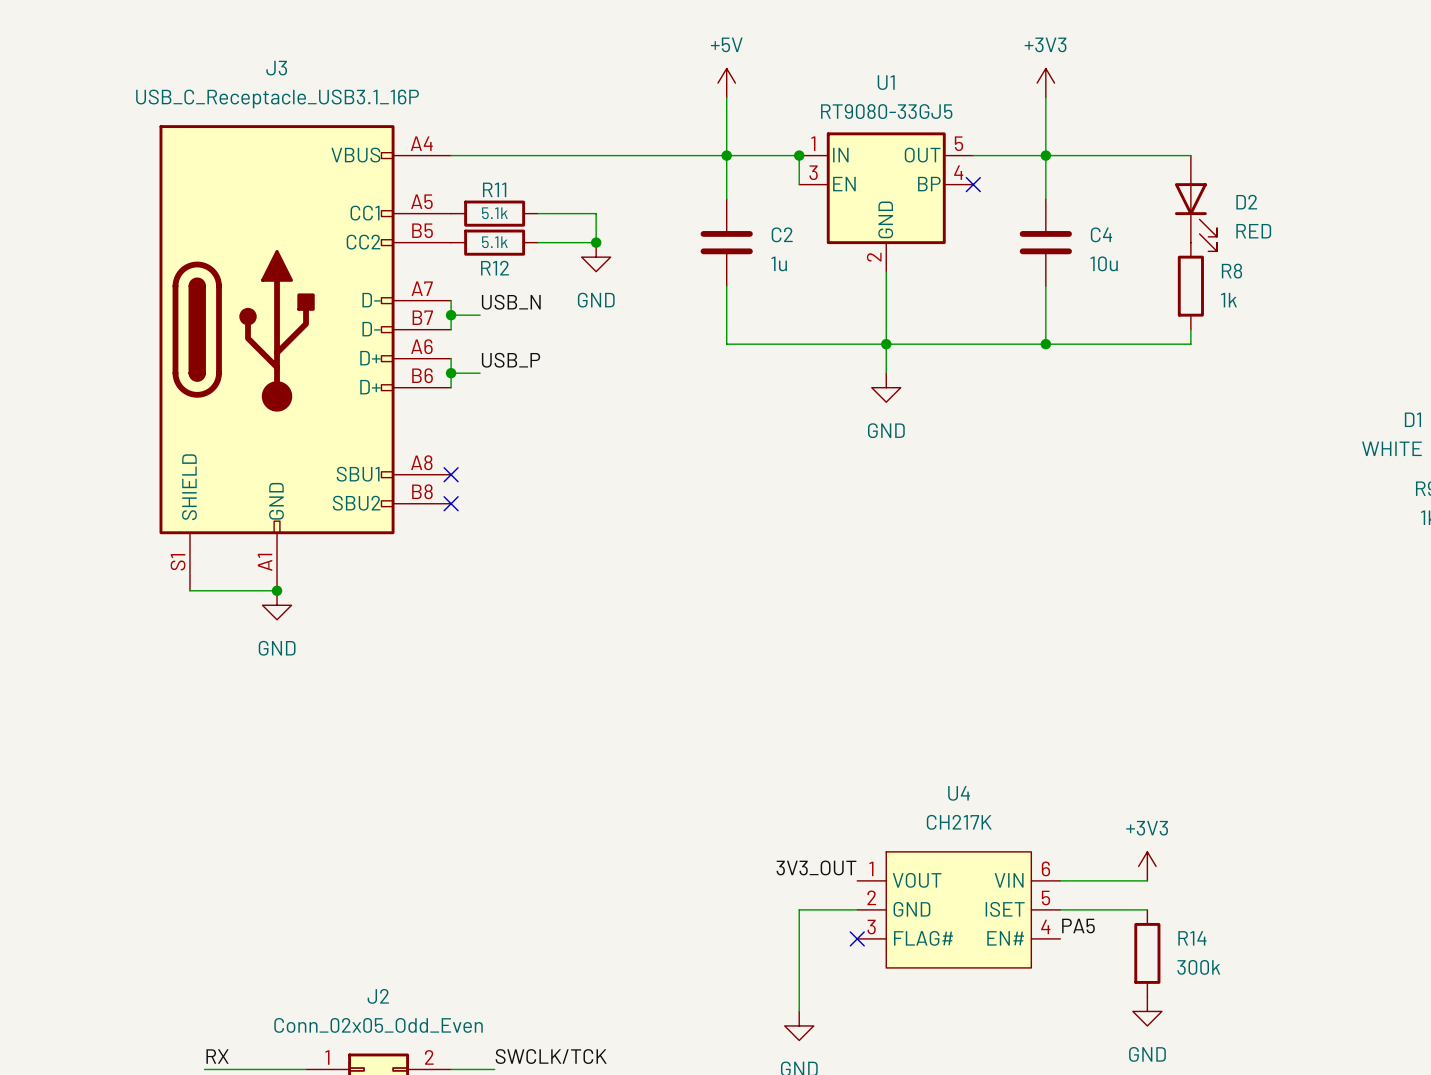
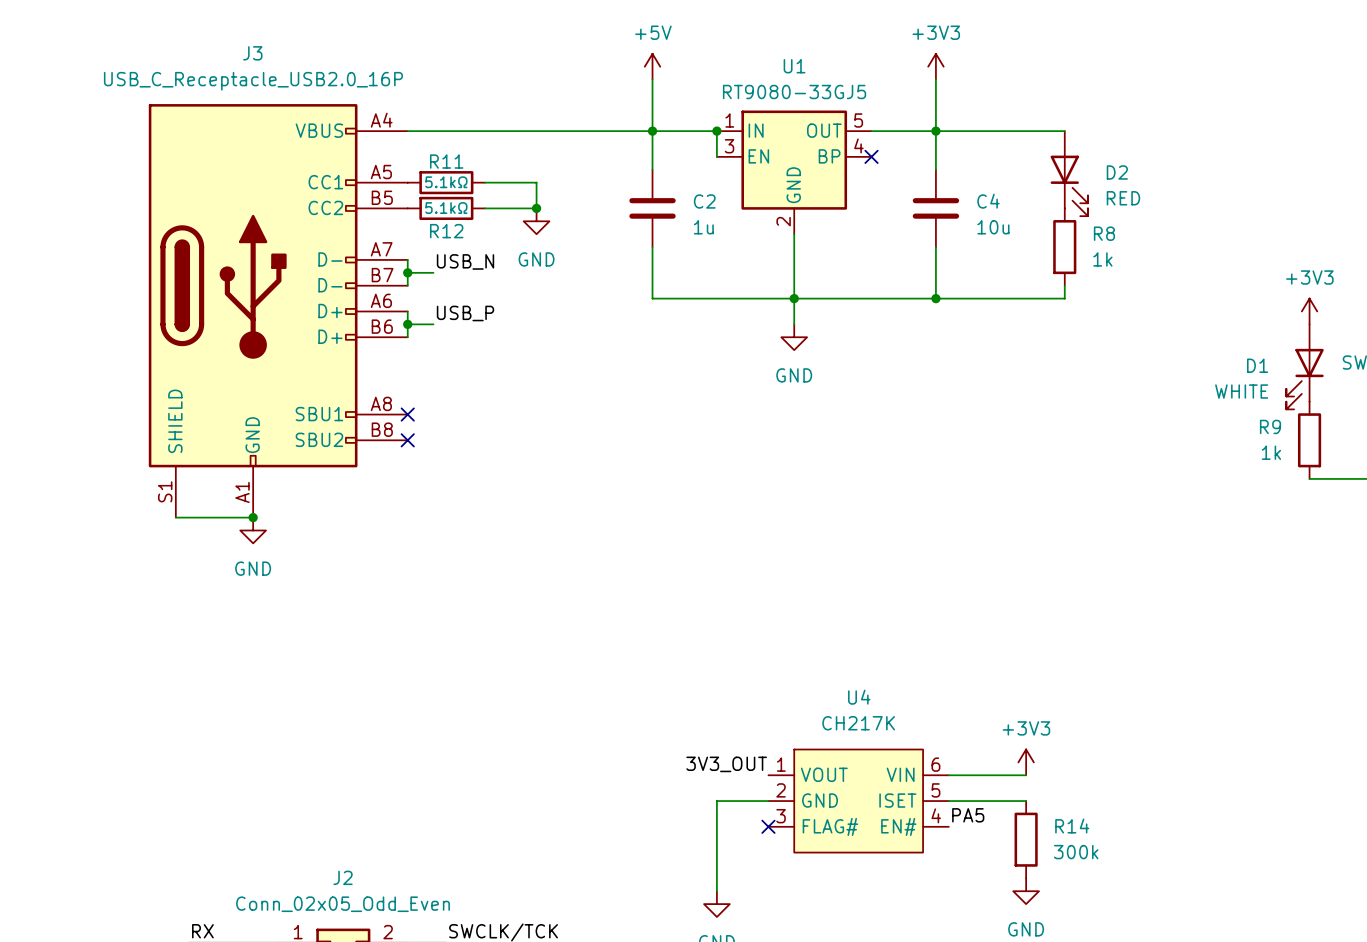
J3 value: USB_C_Receptacle_USB3.1_16P (277, 98) -> USB_C_Receptacle_USB2.0_16P (253, 81)
R11 value: 5.1k (494, 213) -> 5.1kΩ (446, 182)
R12 value: 5.1k (494, 242) -> 5.1kΩ (446, 208)

